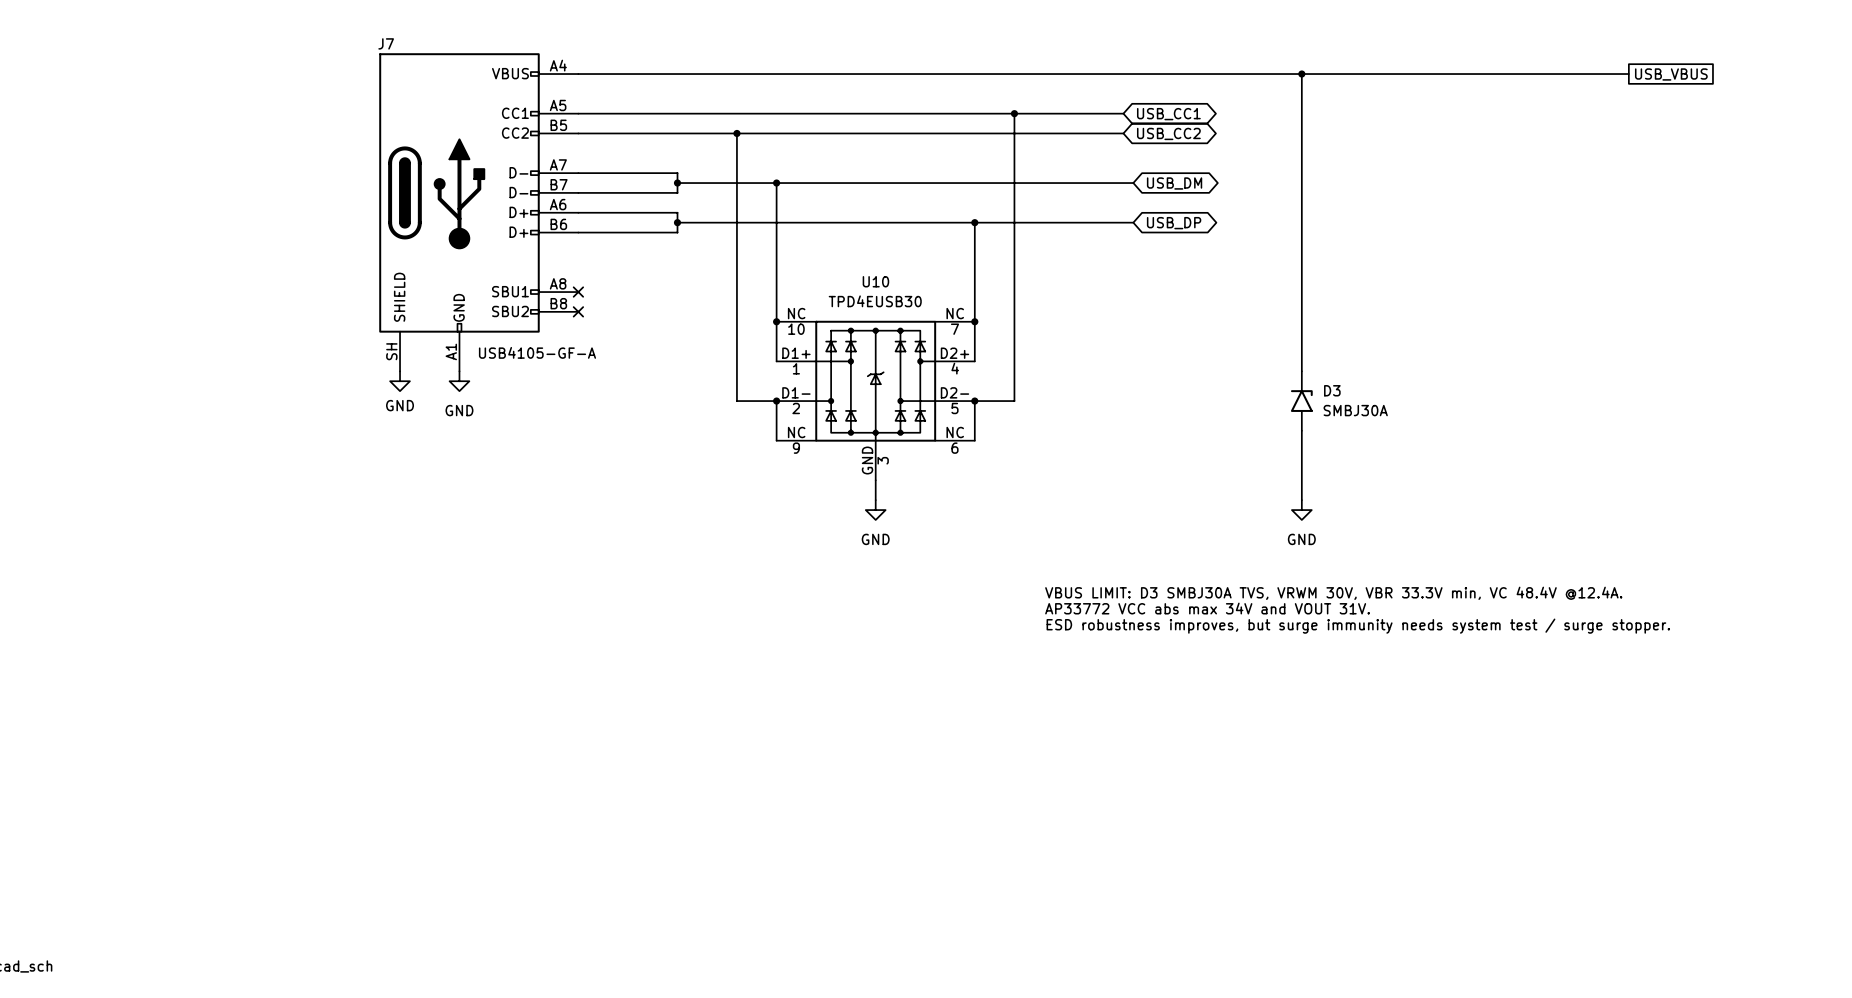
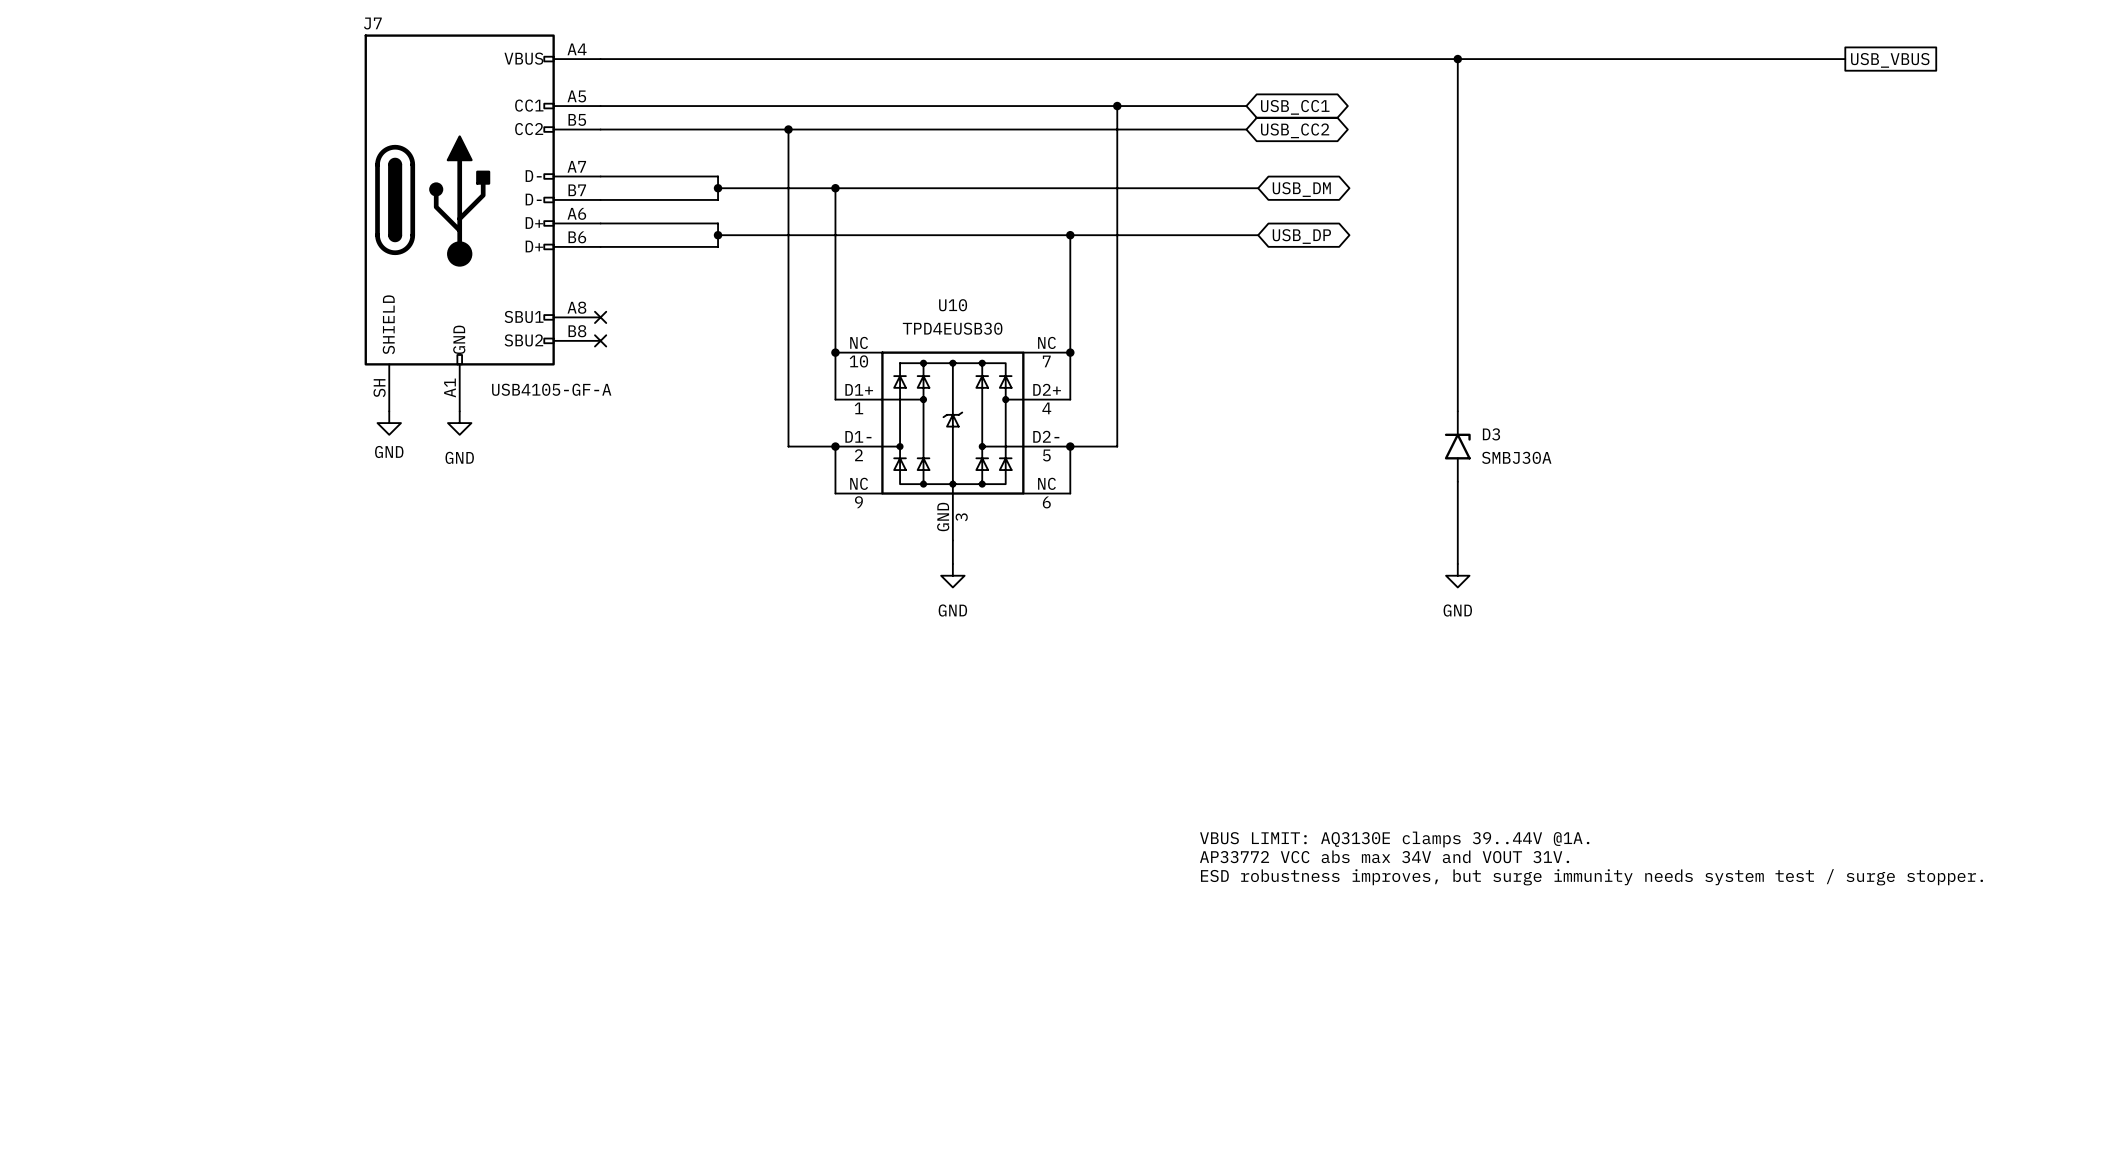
text: VBUS LIMIT: D3 SMBJ30A TVS, VRWM 30V, VBR 33.3V min, VC 48.4V @12.4A. (1333, 593) -> none
text position: AP33772 VCC abs max 34V and VOUT 31V. (1207, 608) -> AP33772 VCC abs max 34V and VOUT 31V. (1384, 856)
text position: ESD robustness improves, but surge immunity needs system test / surge stopper. (1358, 626) -> ESD robustness improves, but surge immunity needs system test / surge stopper. (1591, 877)
text: none -> VBUS LIMIT: AQ3130E clamps 39..44V @1A. (1394, 839)

